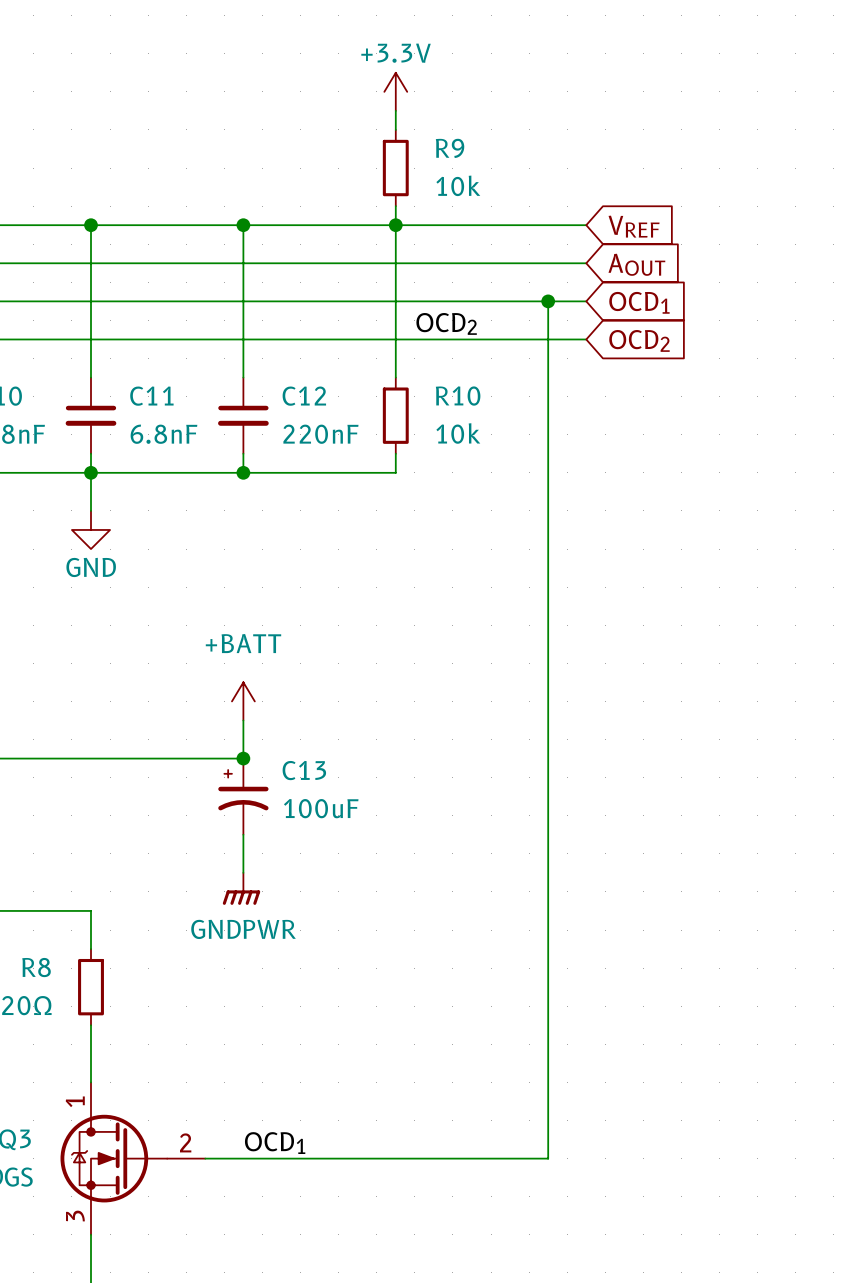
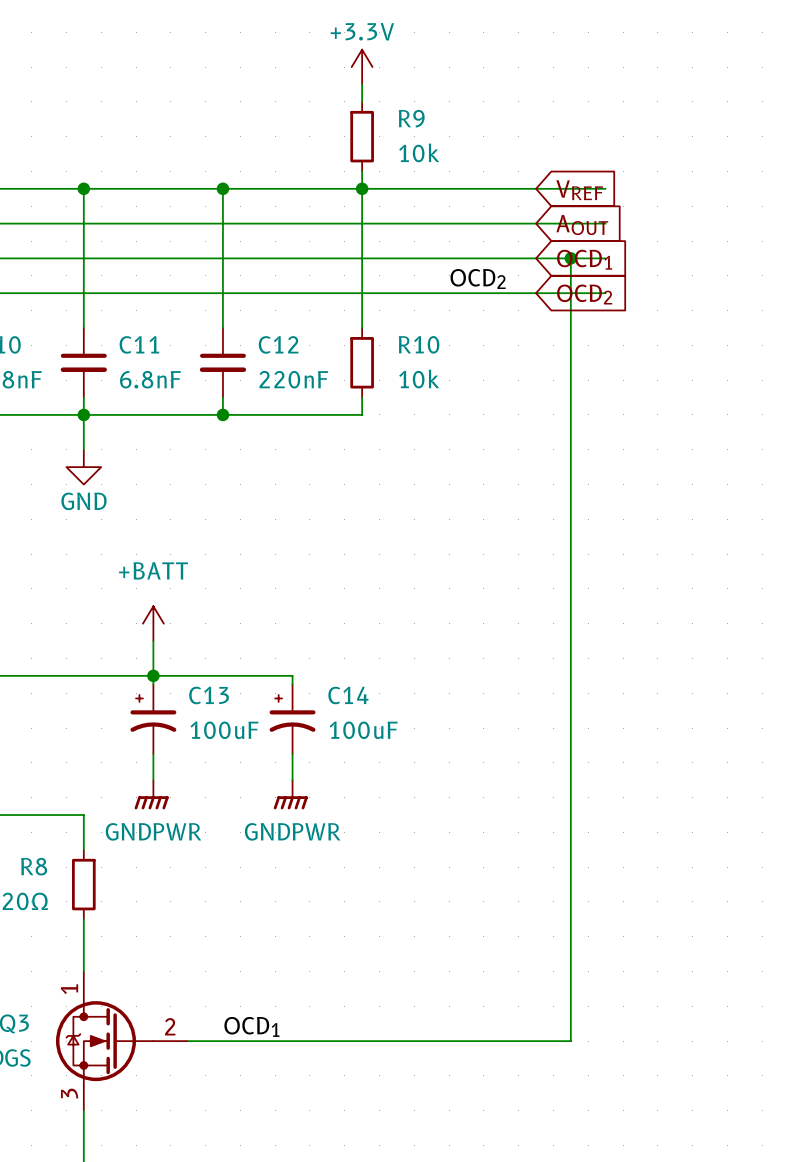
wire: none -> (536, 188) (605, 188)
wire: none -> (536, 223) (605, 223)
wire: (548, 301) (548, 1158) -> (570, 258) (570, 1041) (501, 1041)
junction position: (548, 301) -> (570, 258)
wire: none -> (536, 258) (605, 258)
label position: OCD2 (446, 323) -> OCD2 (478, 278)
wire: none -> (536, 293) (605, 293)
power symbol position: +BATT (243, 701) -> +BATT (153, 623)
wire: none -> (153, 641) (153, 684)
wire: (243, 720) (243, 758) -> (292, 684) (292, 675) (222, 675)
junction position: (243, 758) -> (153, 675)
C13 position: (243, 796) -> (153, 719)
C14: none -> 100uF (292, 719)
wire: (243, 834) (243, 872) -> none
wire: none -> (153, 754) (153, 780)
wire: none -> (292, 754) (292, 780)
power symbol: none -> GNDPWR (151, 794)
power symbol: GNDPWR (241, 888) -> none
power symbol: none -> GNDPWR (290, 794)

